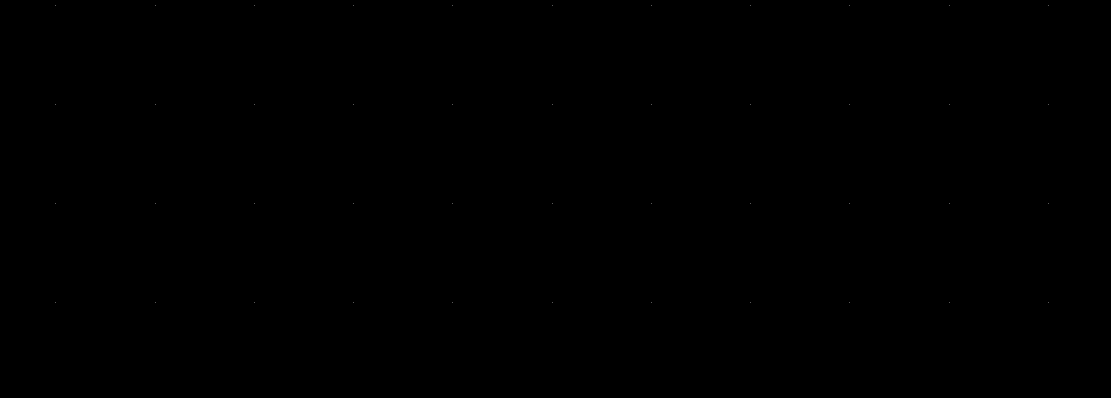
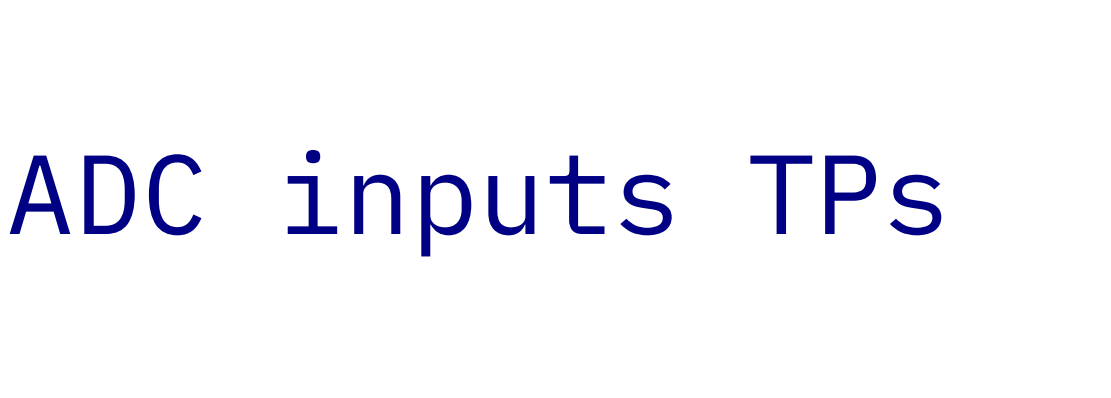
text: none -> ADC inputs TPs (475, 203)

